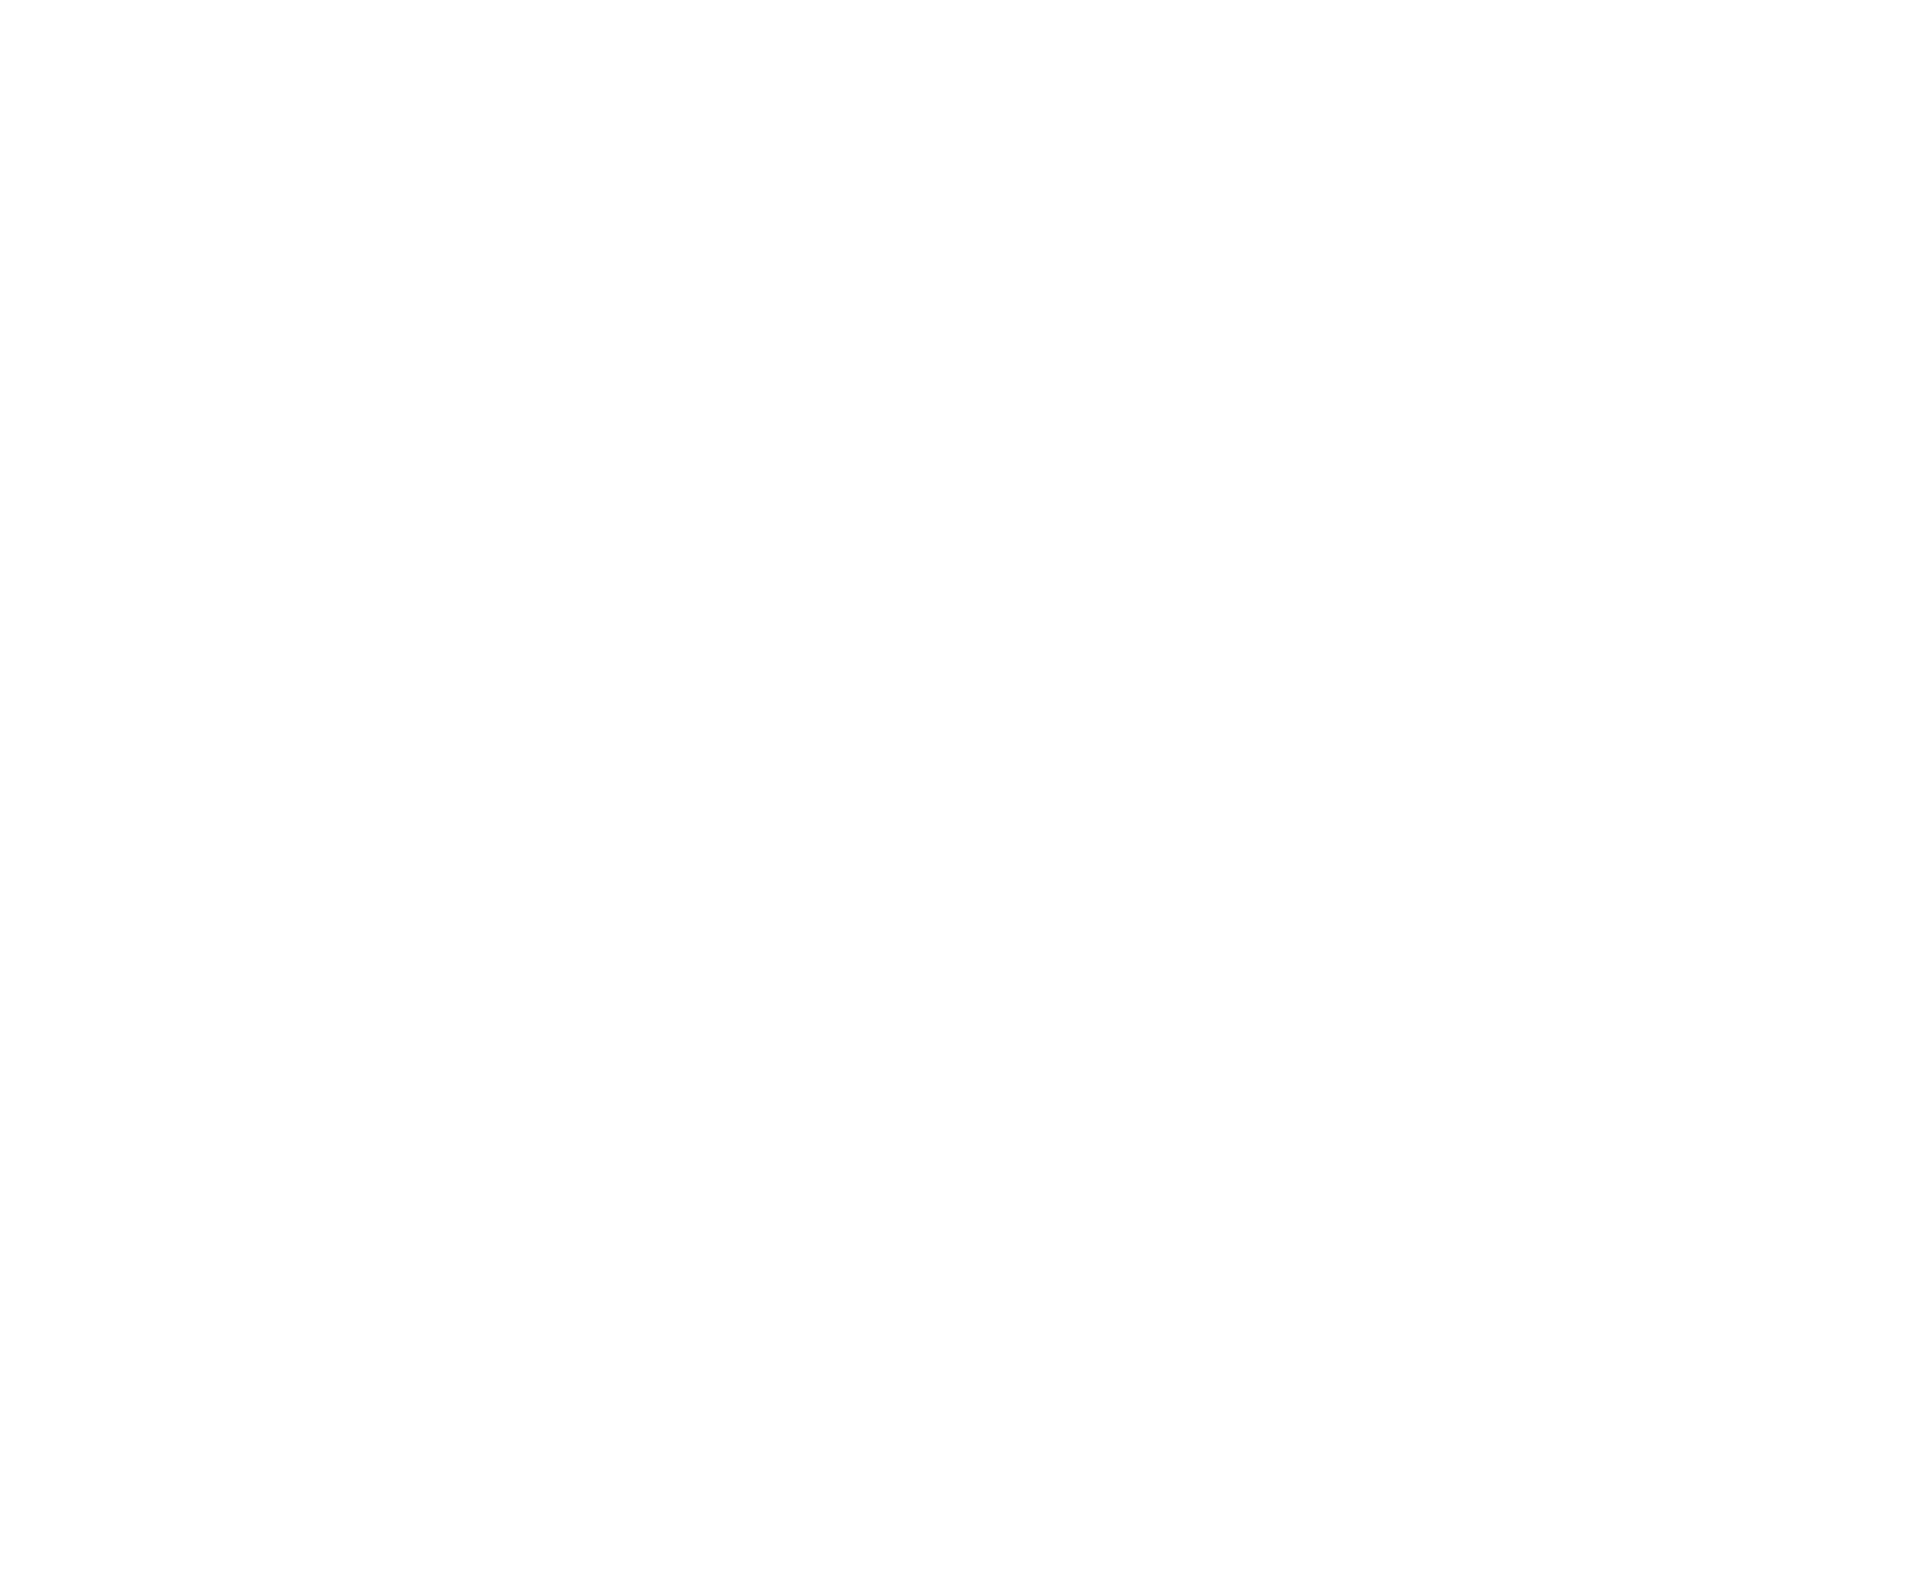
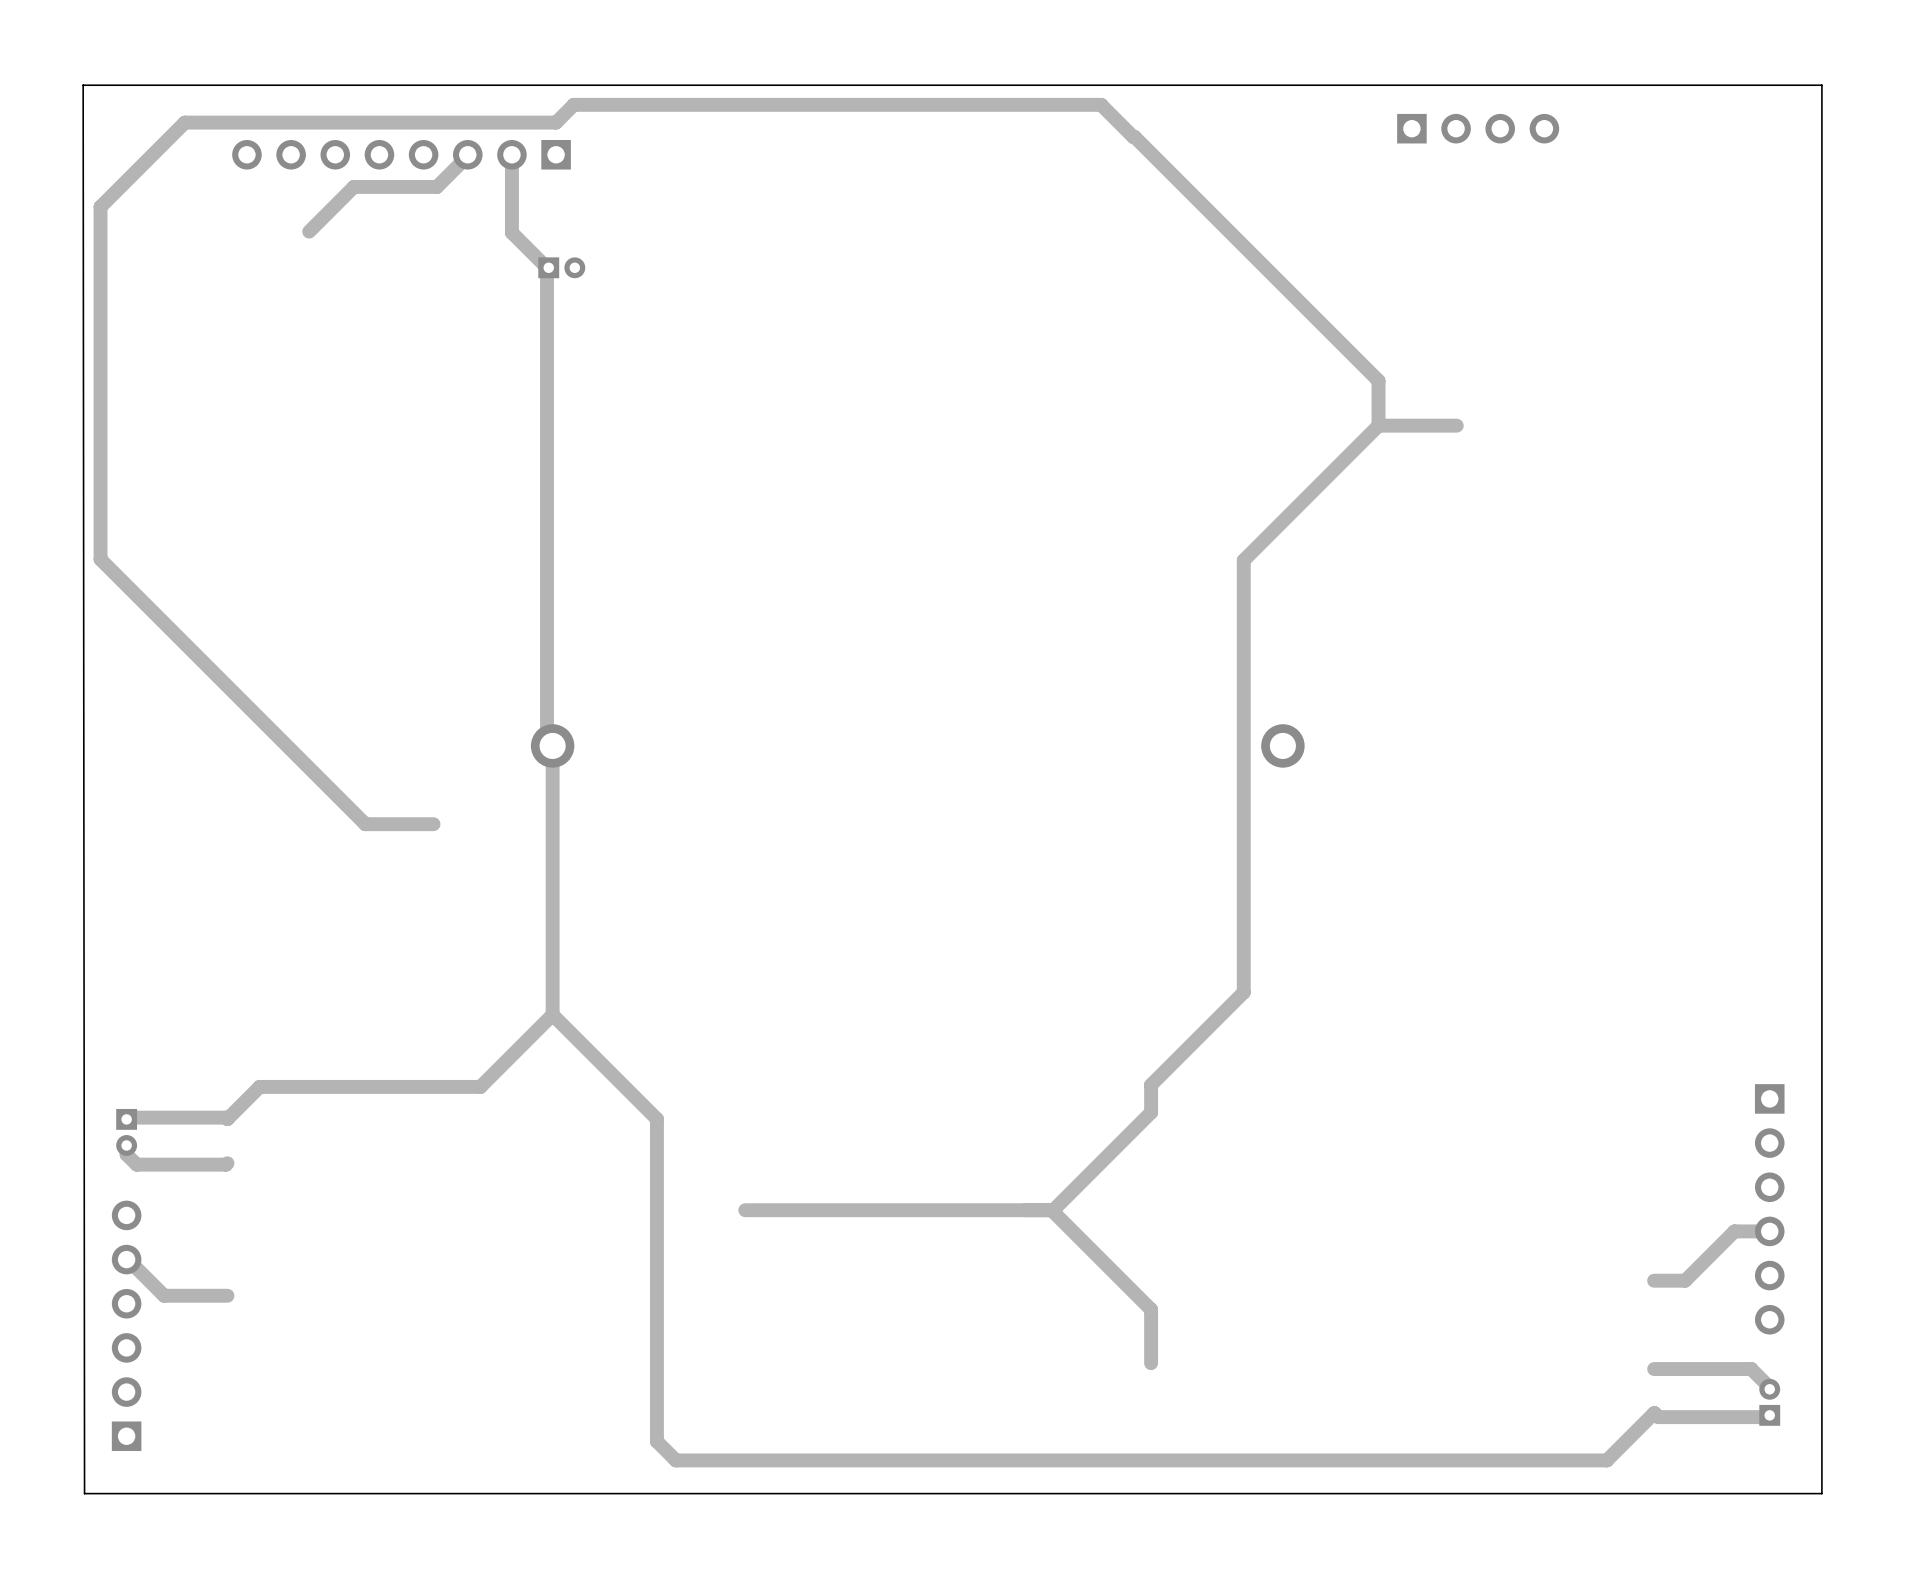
board edge: none -> (1821, 85) (83, 85) (84, 1493) (1821, 1493) (1821, 85)
part: none -> (1478, 128)
part: none -> (401, 154)
track: none -> (467, 154) (436, 186) (353, 186) (309, 231)
track: none -> (511, 154) (511, 232) (546, 267) (546, 740) (552, 745) (552, 1014)
part: none -> (561, 267)
track: none -> (1378, 425) (1243, 560) (1243, 992) (1151, 1085) (1151, 1112) (1053, 1210) (745, 1210)
track: none -> (1378, 425) (1378, 380) (1101, 104) (573, 104) (556, 122) (184, 122) (100, 206) (100, 559) (365, 824) (433, 824)
track: none -> (1456, 425) (1378, 425)
part: none -> (552, 745)
part: none -> (1282, 745)
track: none -> (552, 1014) (656, 1119) (656, 1441) (675, 1460) (1606, 1460) (1654, 1413) (1658, 1417) (1769, 1417)
track: none -> (552, 1014) (480, 1086) (259, 1086) (227, 1119) (126, 1117)
part: none -> (126, 1132)
track: none -> (126, 1147) (126, 1154) (136, 1164) (227, 1163)
part: none -> (1769, 1209)
track: none -> (1051, 1210) (1151, 1309) (1151, 1363)
track: none -> (1769, 1231) (1734, 1231) (1685, 1280) (1654, 1280)
track: none -> (126, 1259) (164, 1295) (227, 1295)
part: none -> (126, 1325)
track: none -> (1654, 1369) (1751, 1369) (1769, 1387)
part: none -> (1769, 1402)

